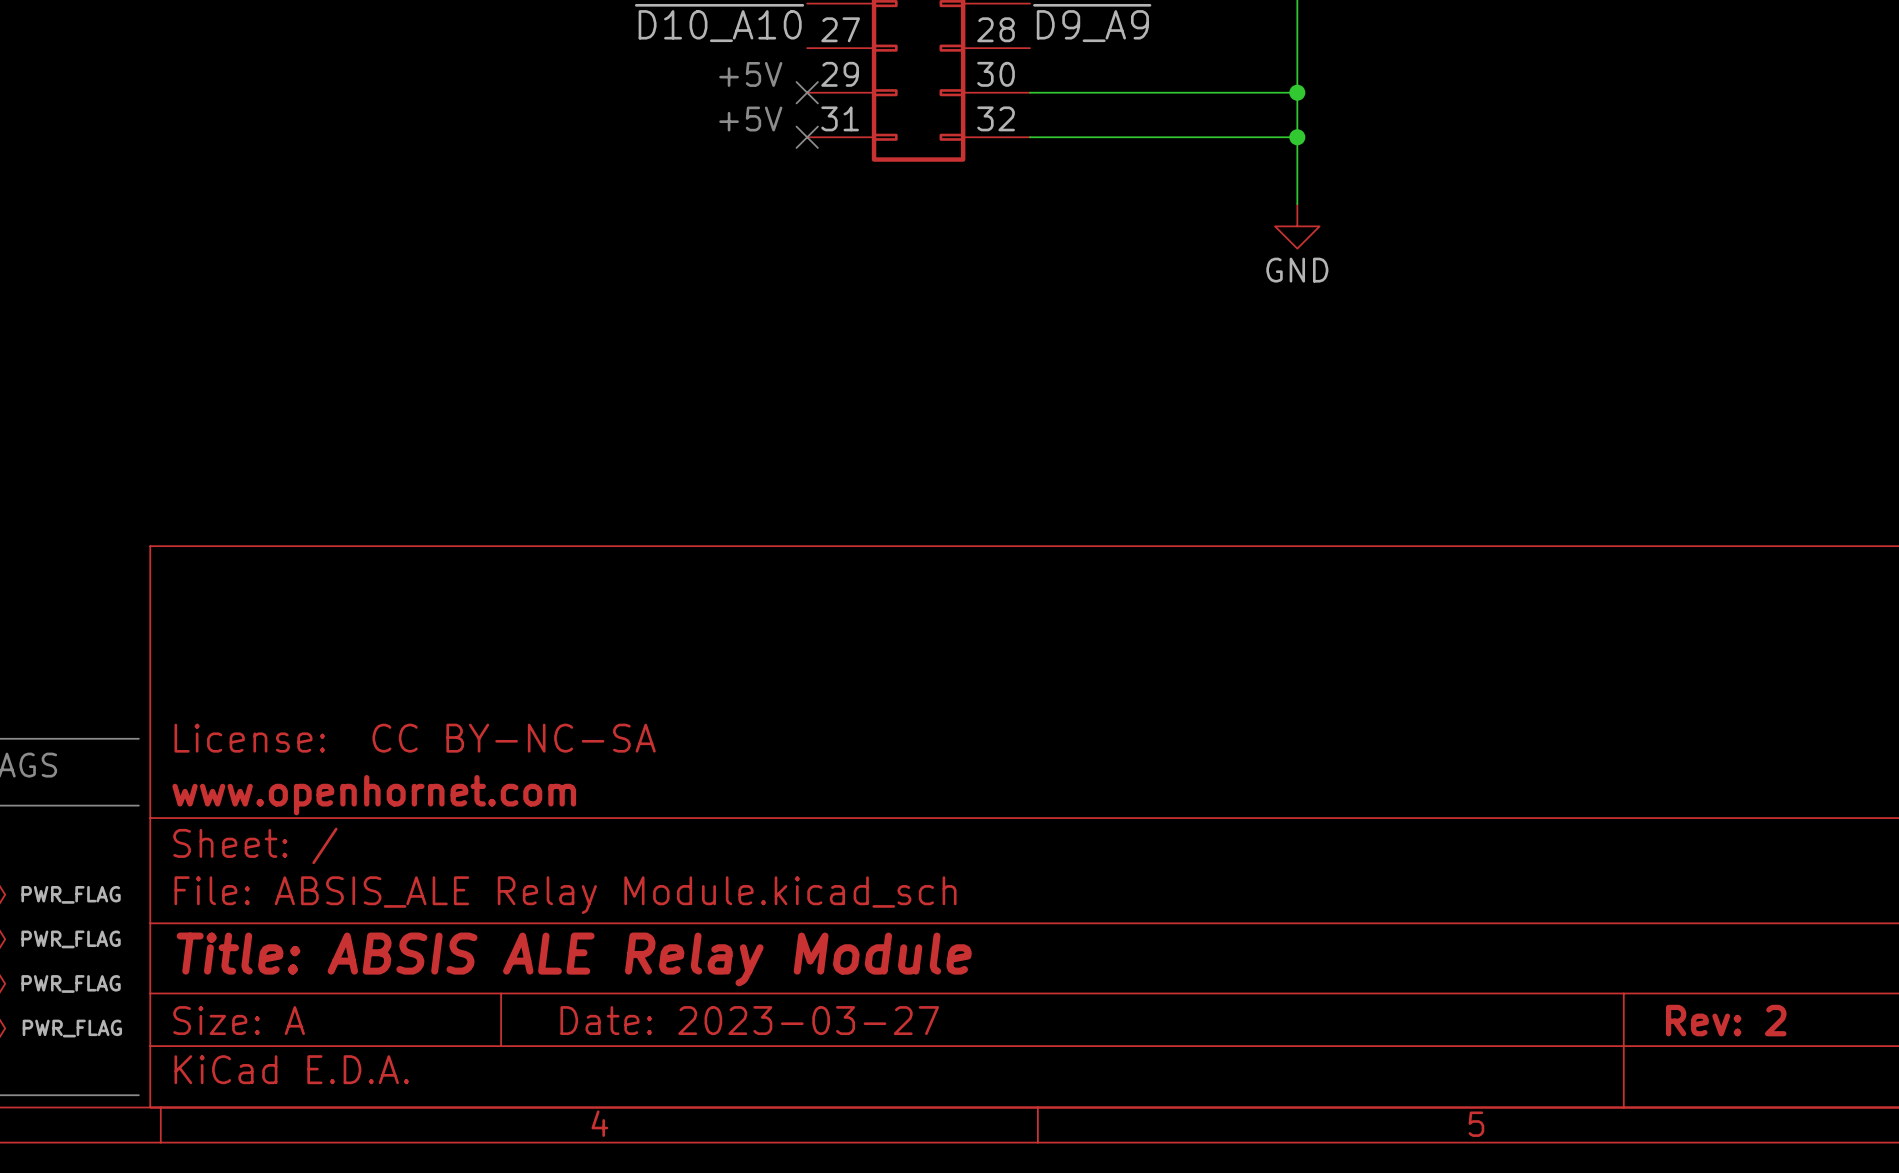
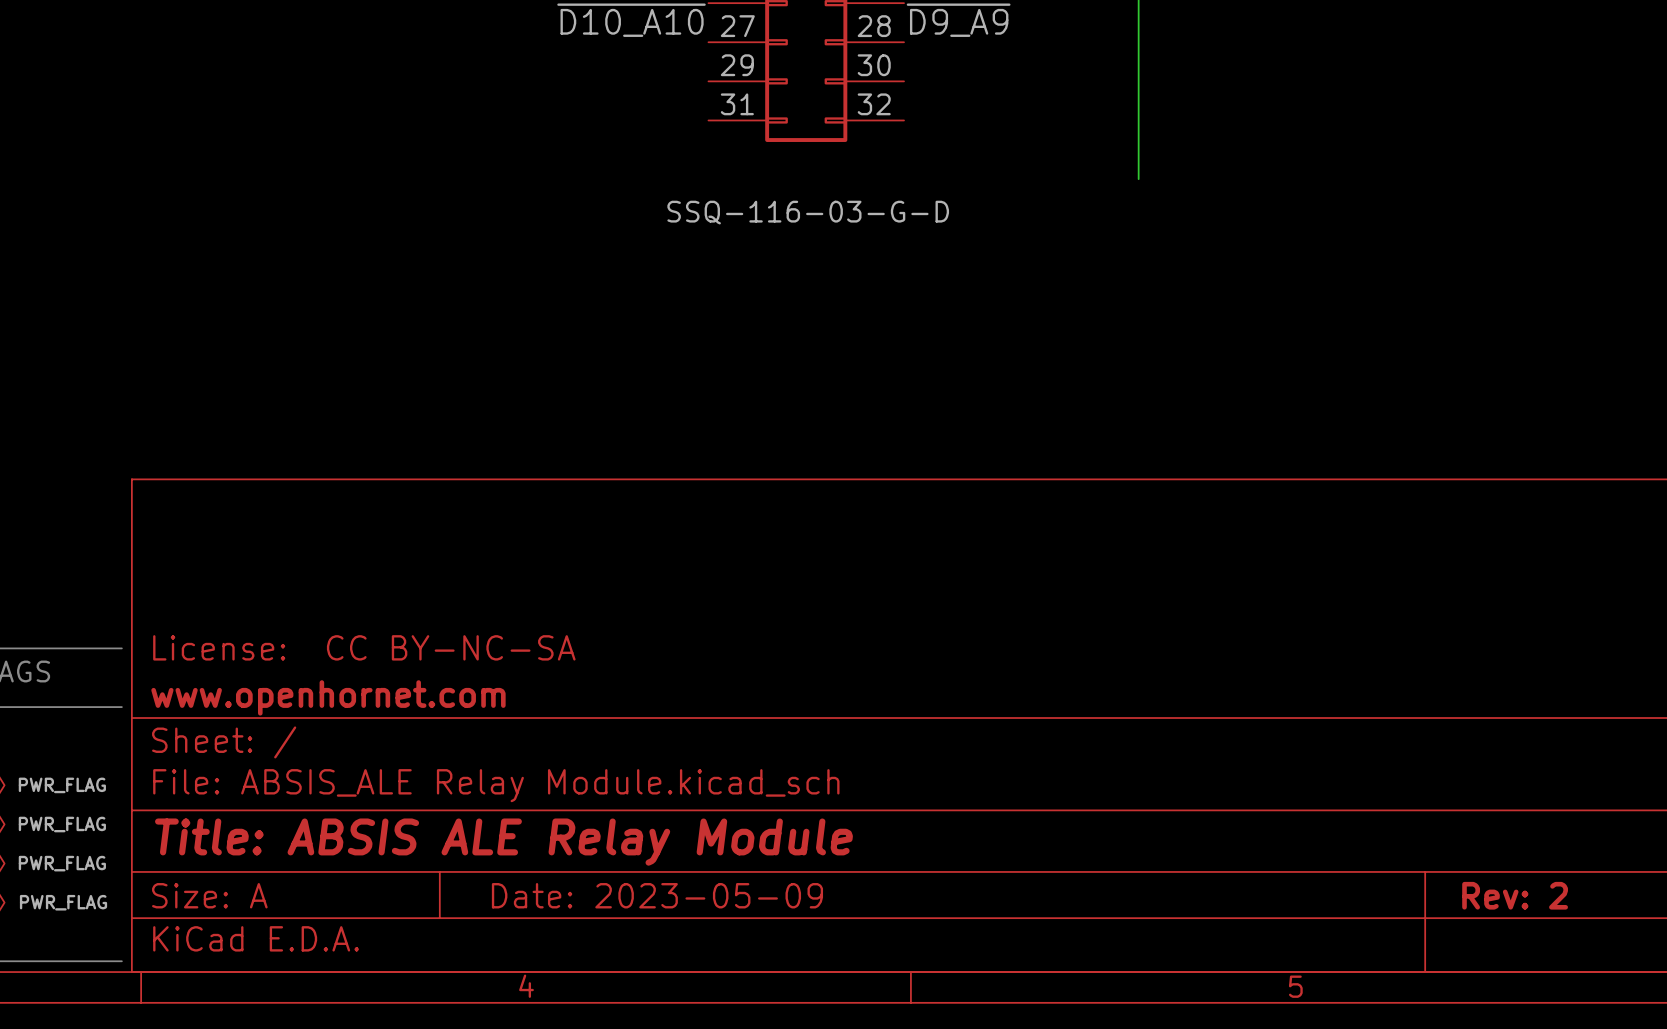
text: +5V (750, 74) -> none
no-connect mark: (807, 92) -> none
wire: (1029, 92) (1297, 92) -> none
junction: (1297, 92) -> none
text: +5V (750, 119) -> none
no-connect mark: (807, 137) -> none
wire: (1029, 137) (1297, 137) -> none
junction: (1297, 137) -> none
power symbol: GND (1297, 226) -> none
part text: none -> SSQ-116-03-G-D (808, 212)
title block: Date: 2023-03-27 (749, 1020) -> Date: 2023-05-09 (657, 895)

